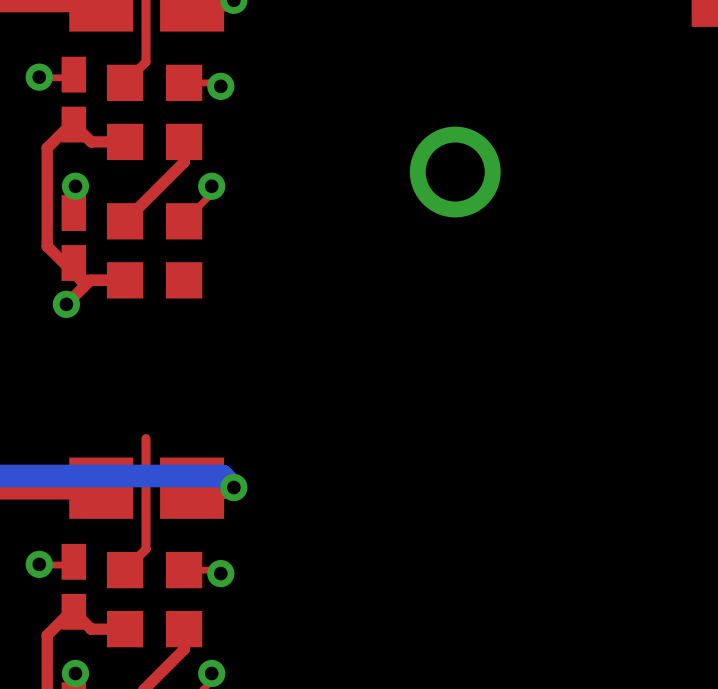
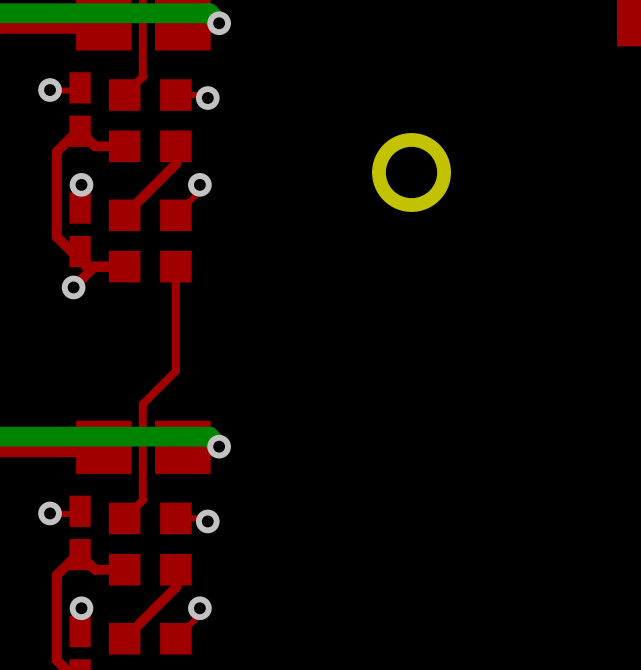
top track: none -> (175, 266) (175, 371) (142, 404)

